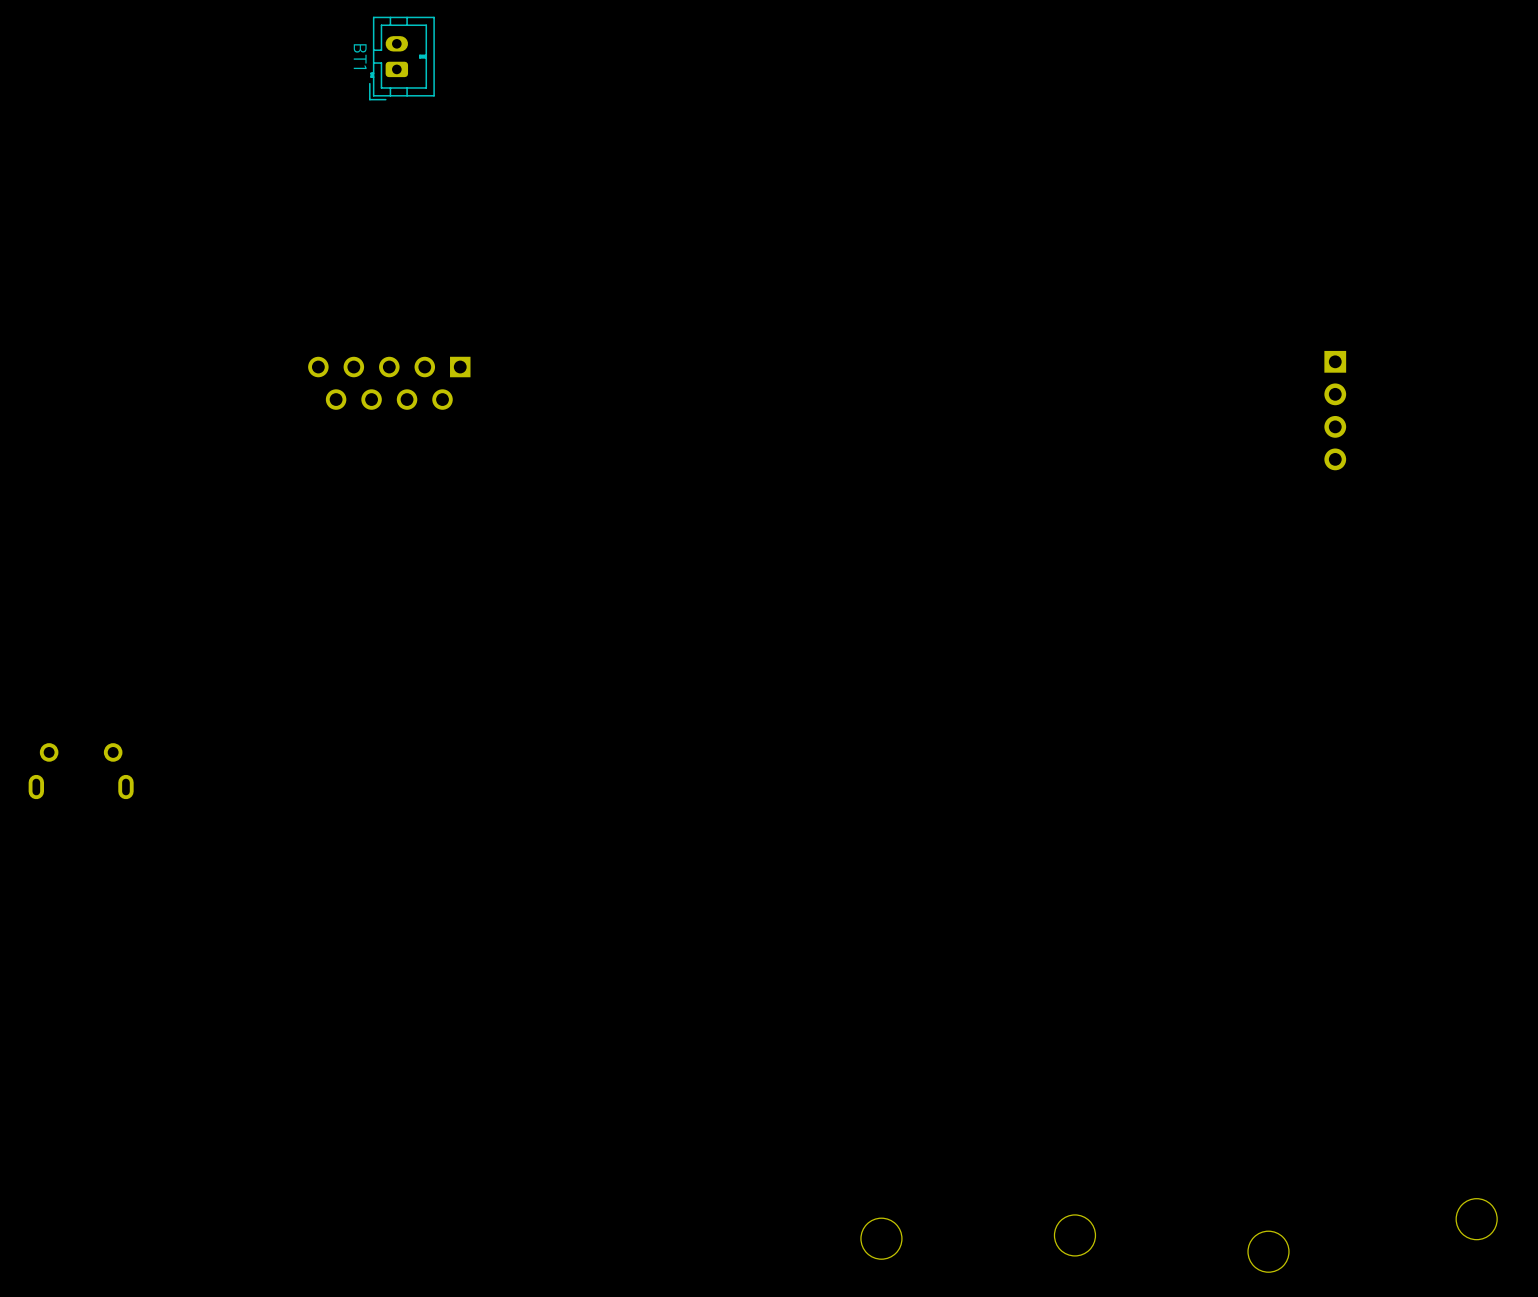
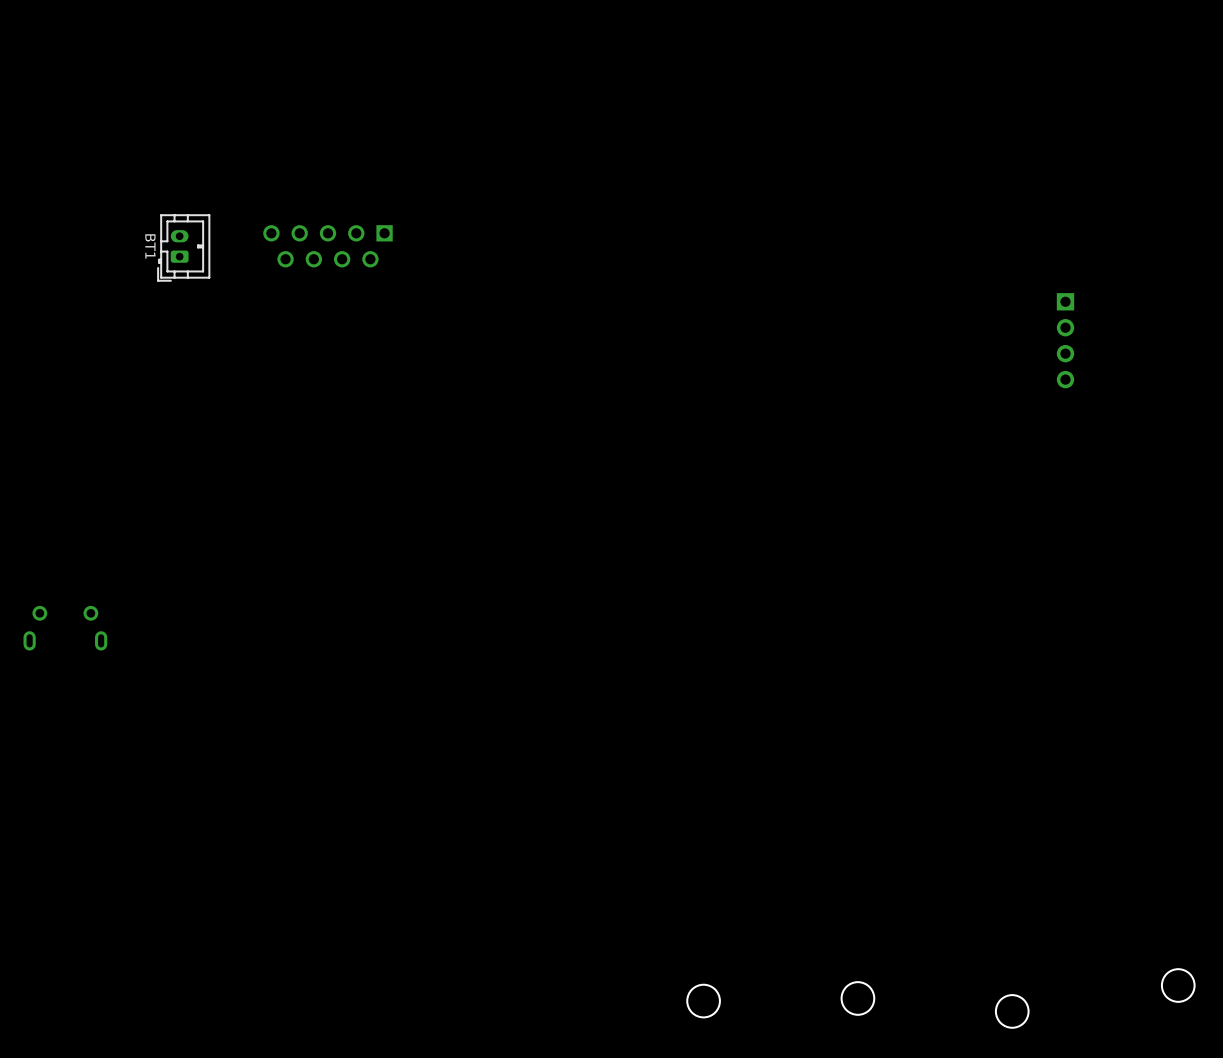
BT1 position: (401, 58) -> (183, 247)
part position: (389, 383) -> (327, 246)

